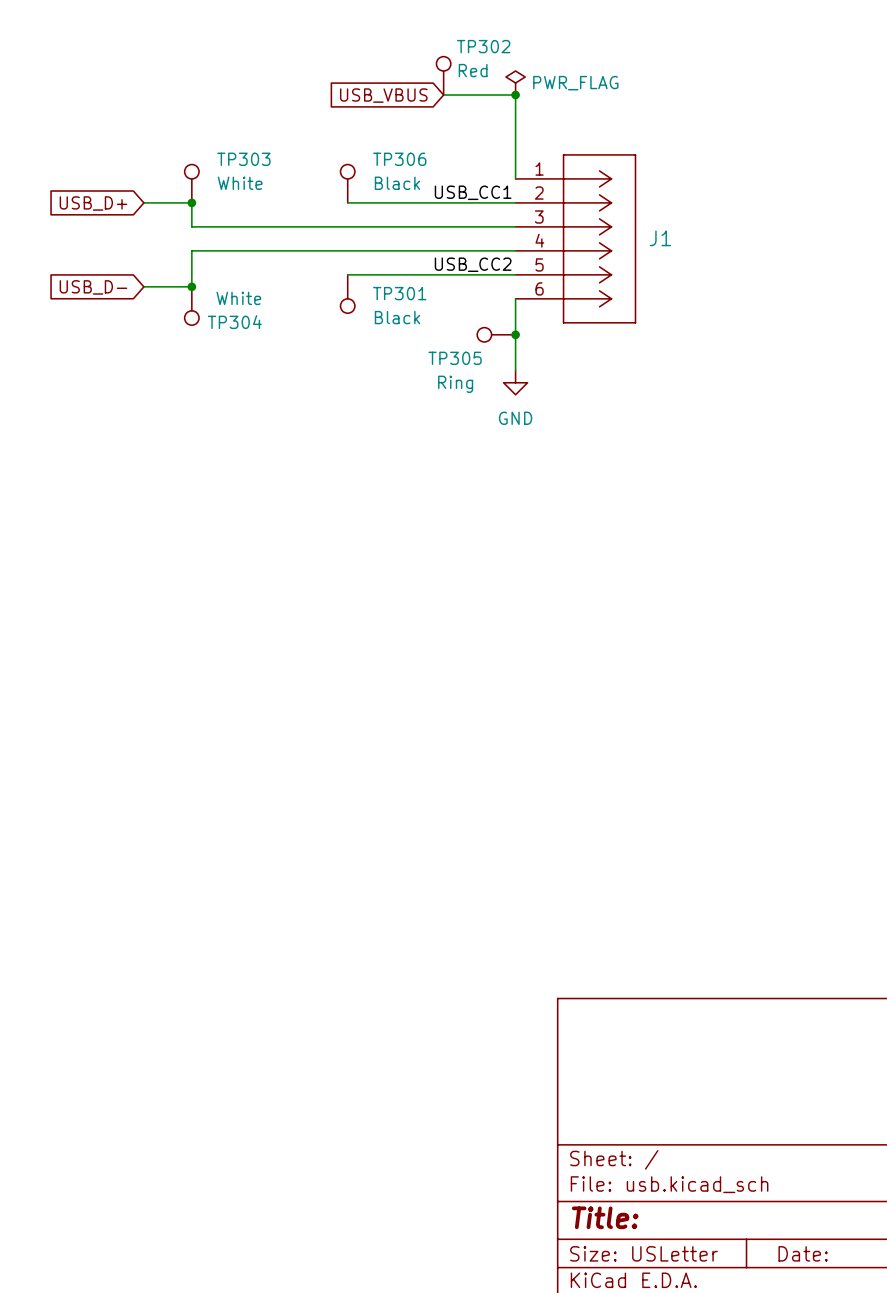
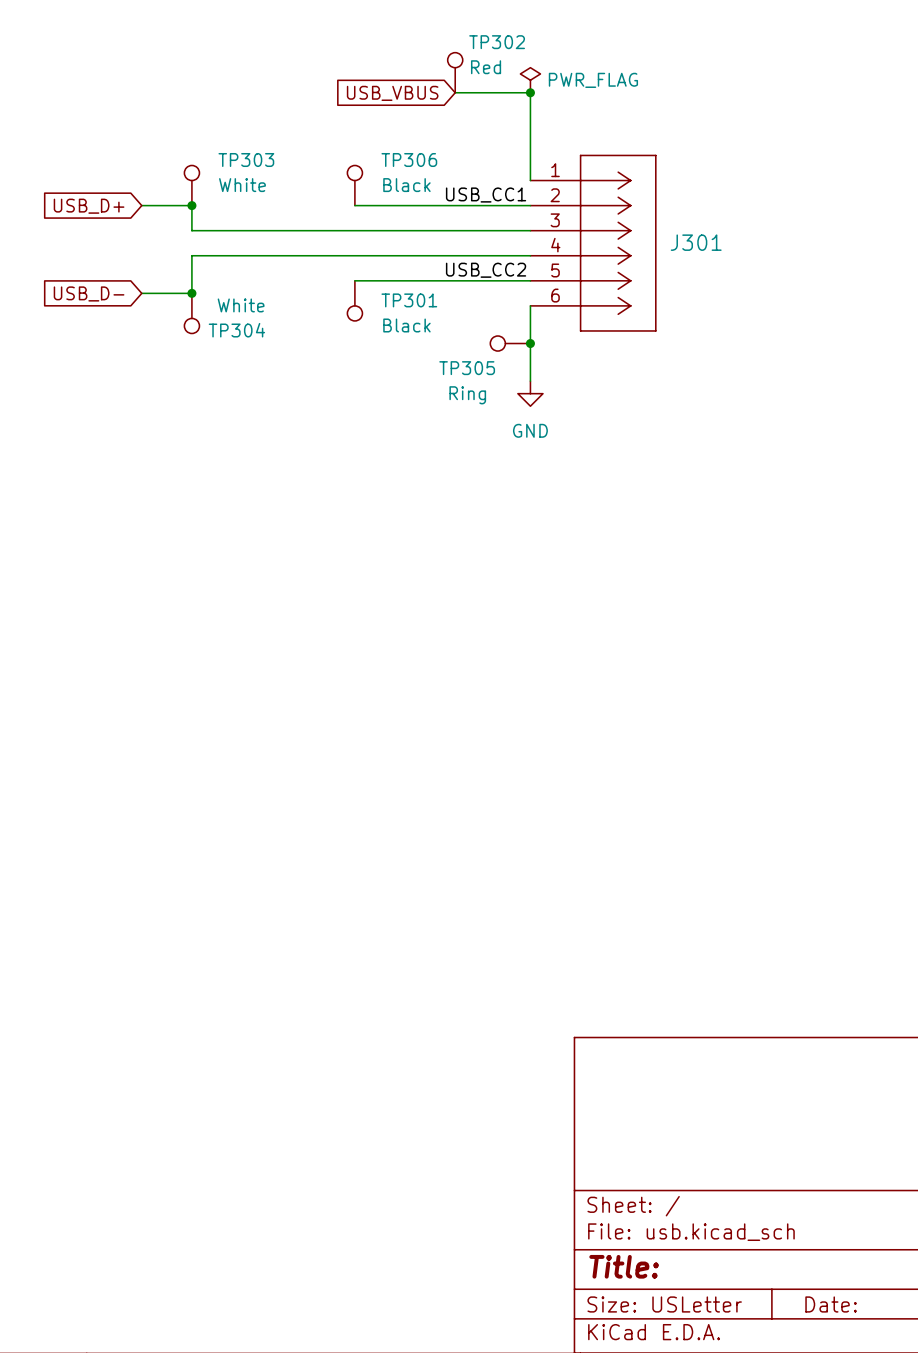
J1 name: J1 (660, 238) -> J301 (696, 242)

